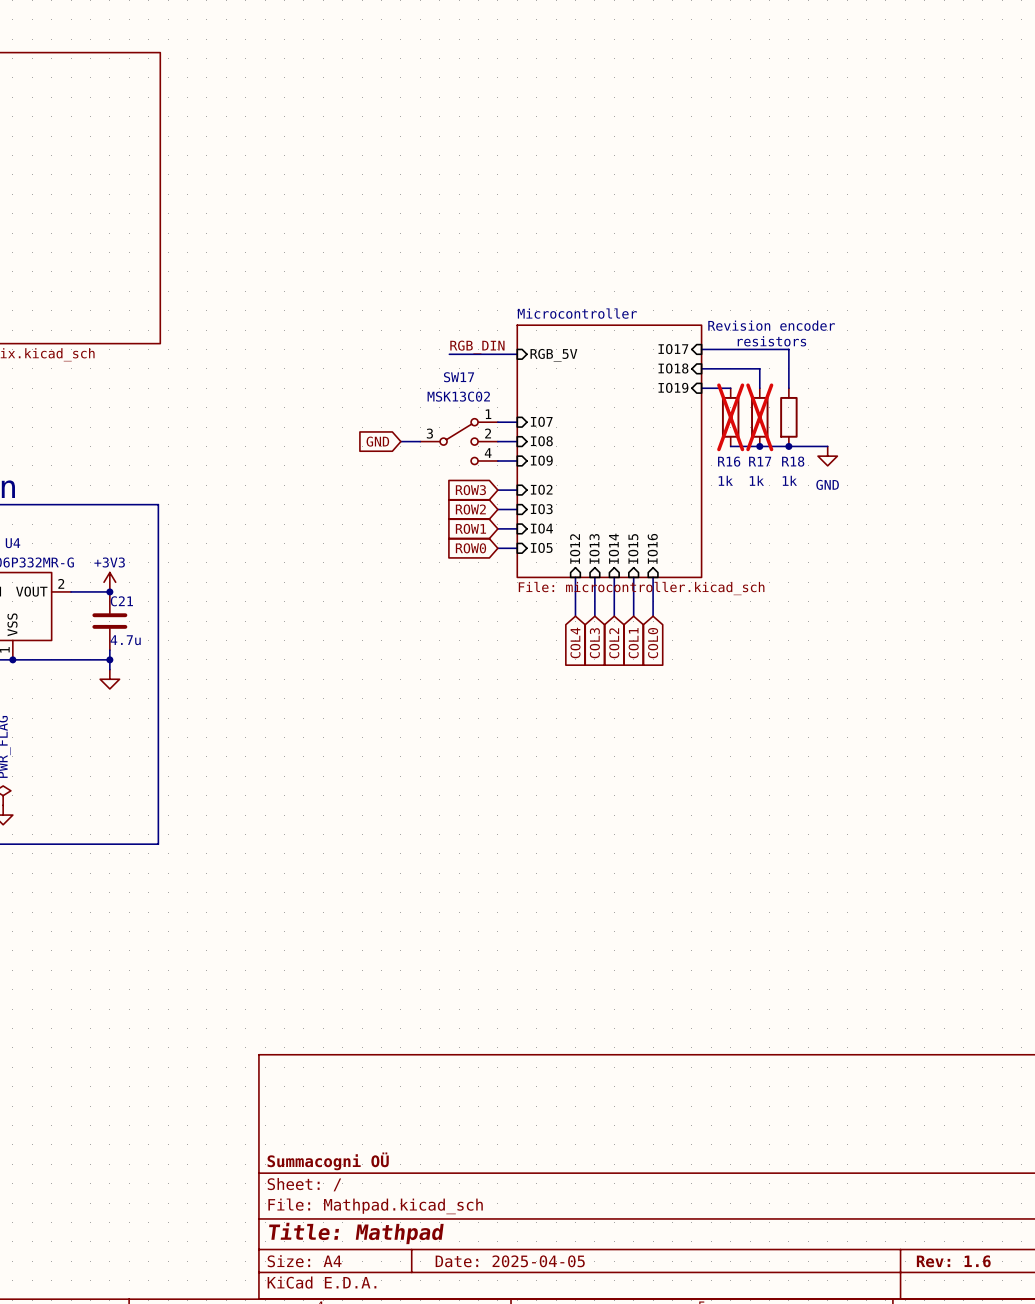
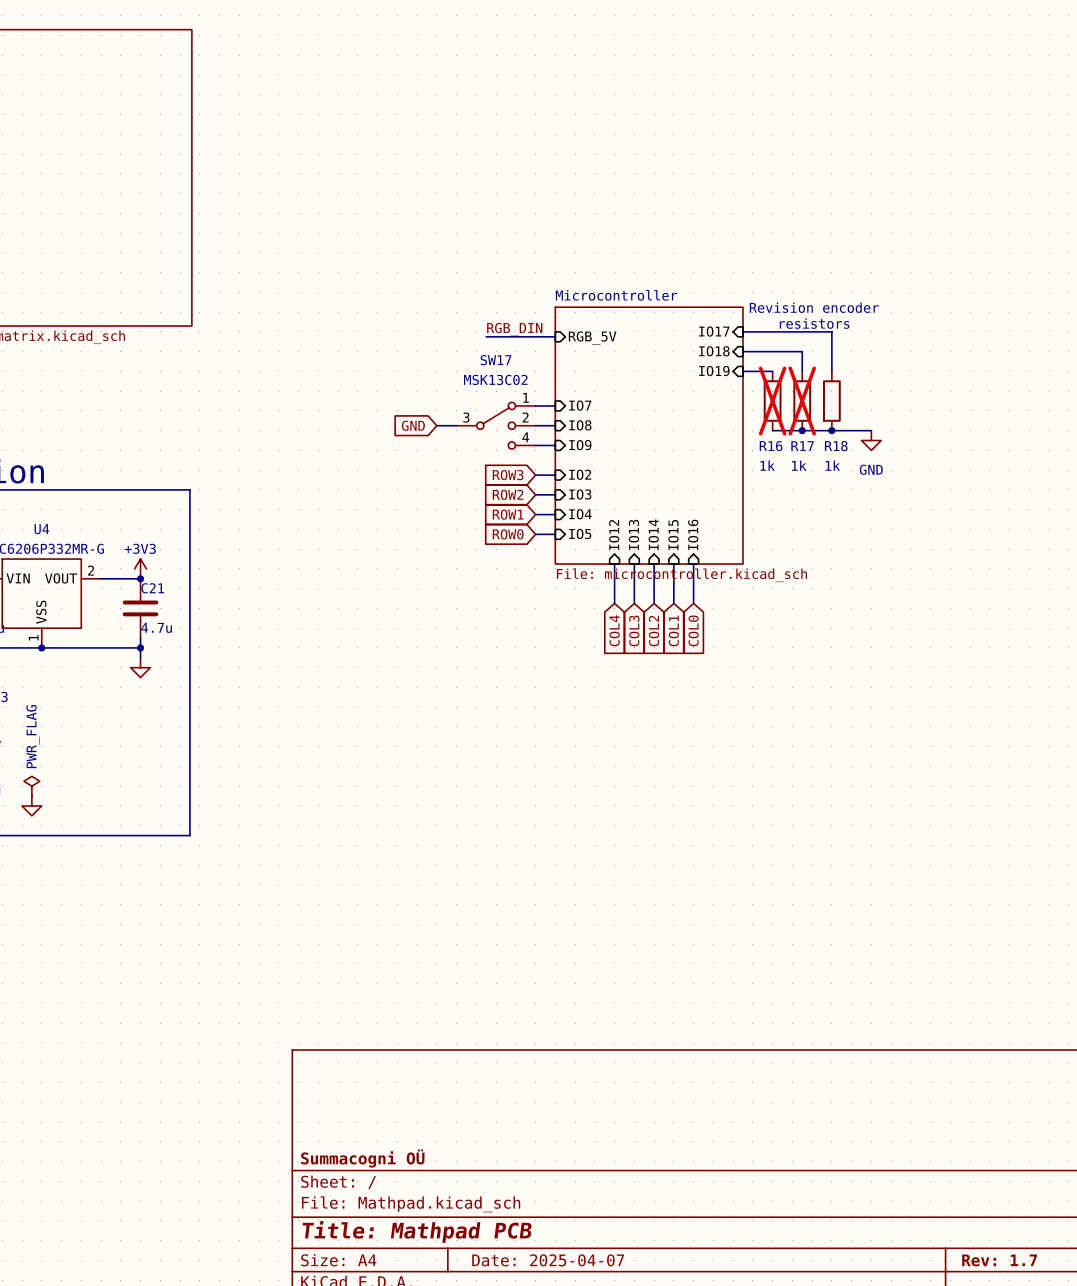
title block: Title: Mathpad (356, 1233) -> Title: Mathpad PCB (417, 1231)
title block: Date: 2025-04-05 (510, 1261) -> Date: 2025-04-07 (548, 1260)
title block: Rev: 1.6 (953, 1261) -> Rev: 1.7 (999, 1260)

